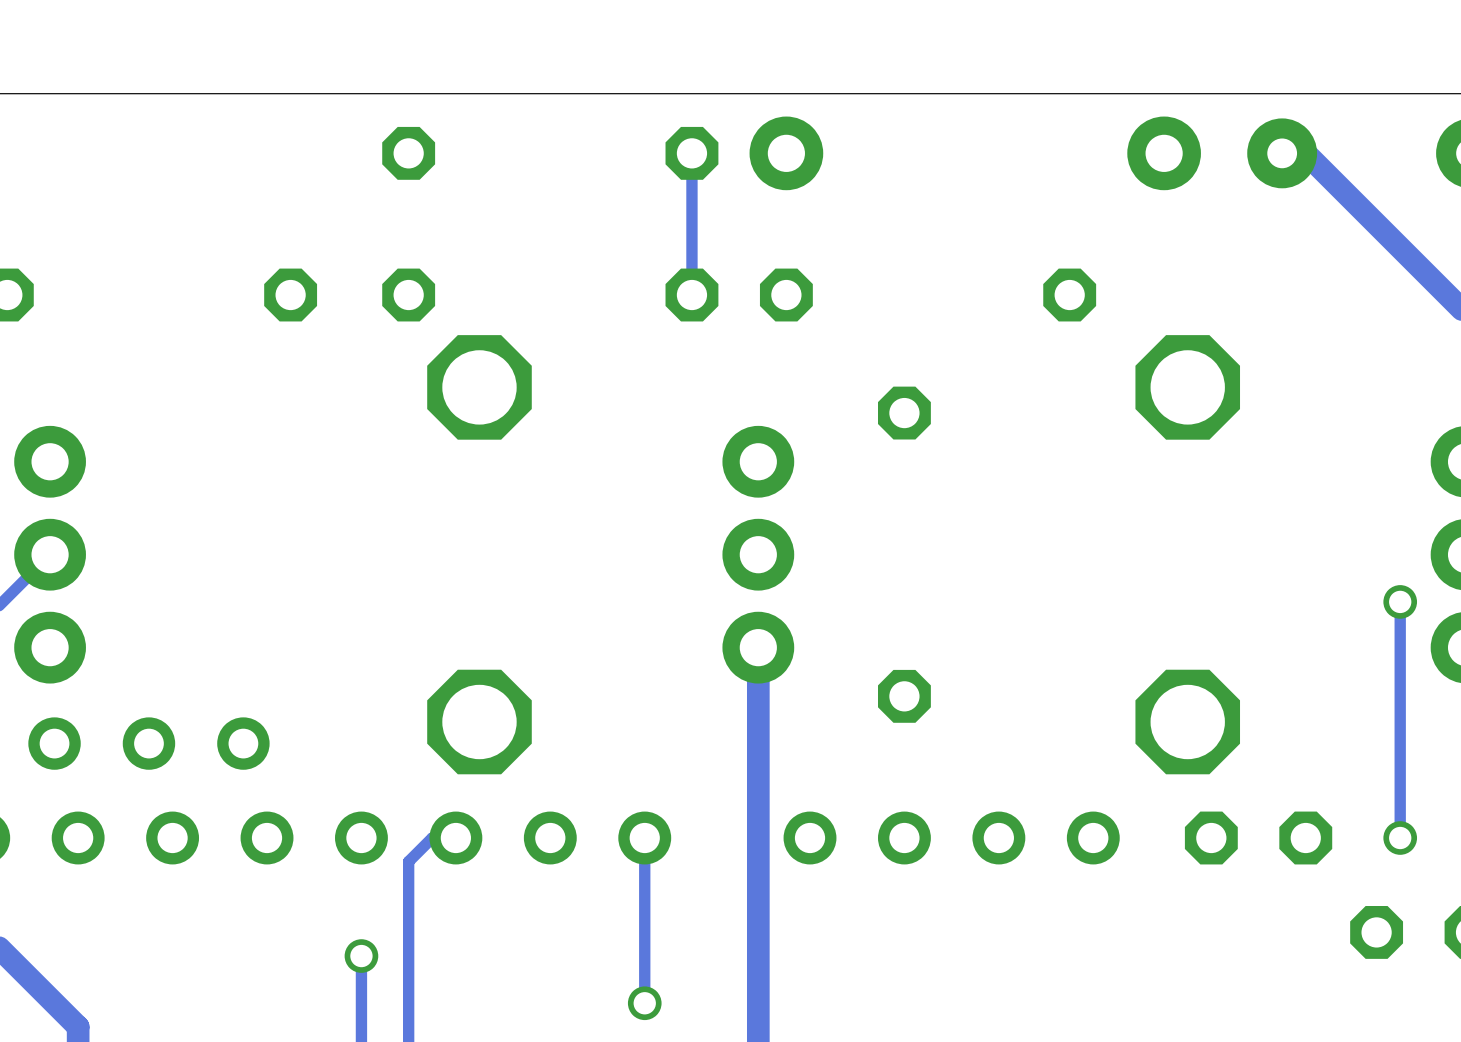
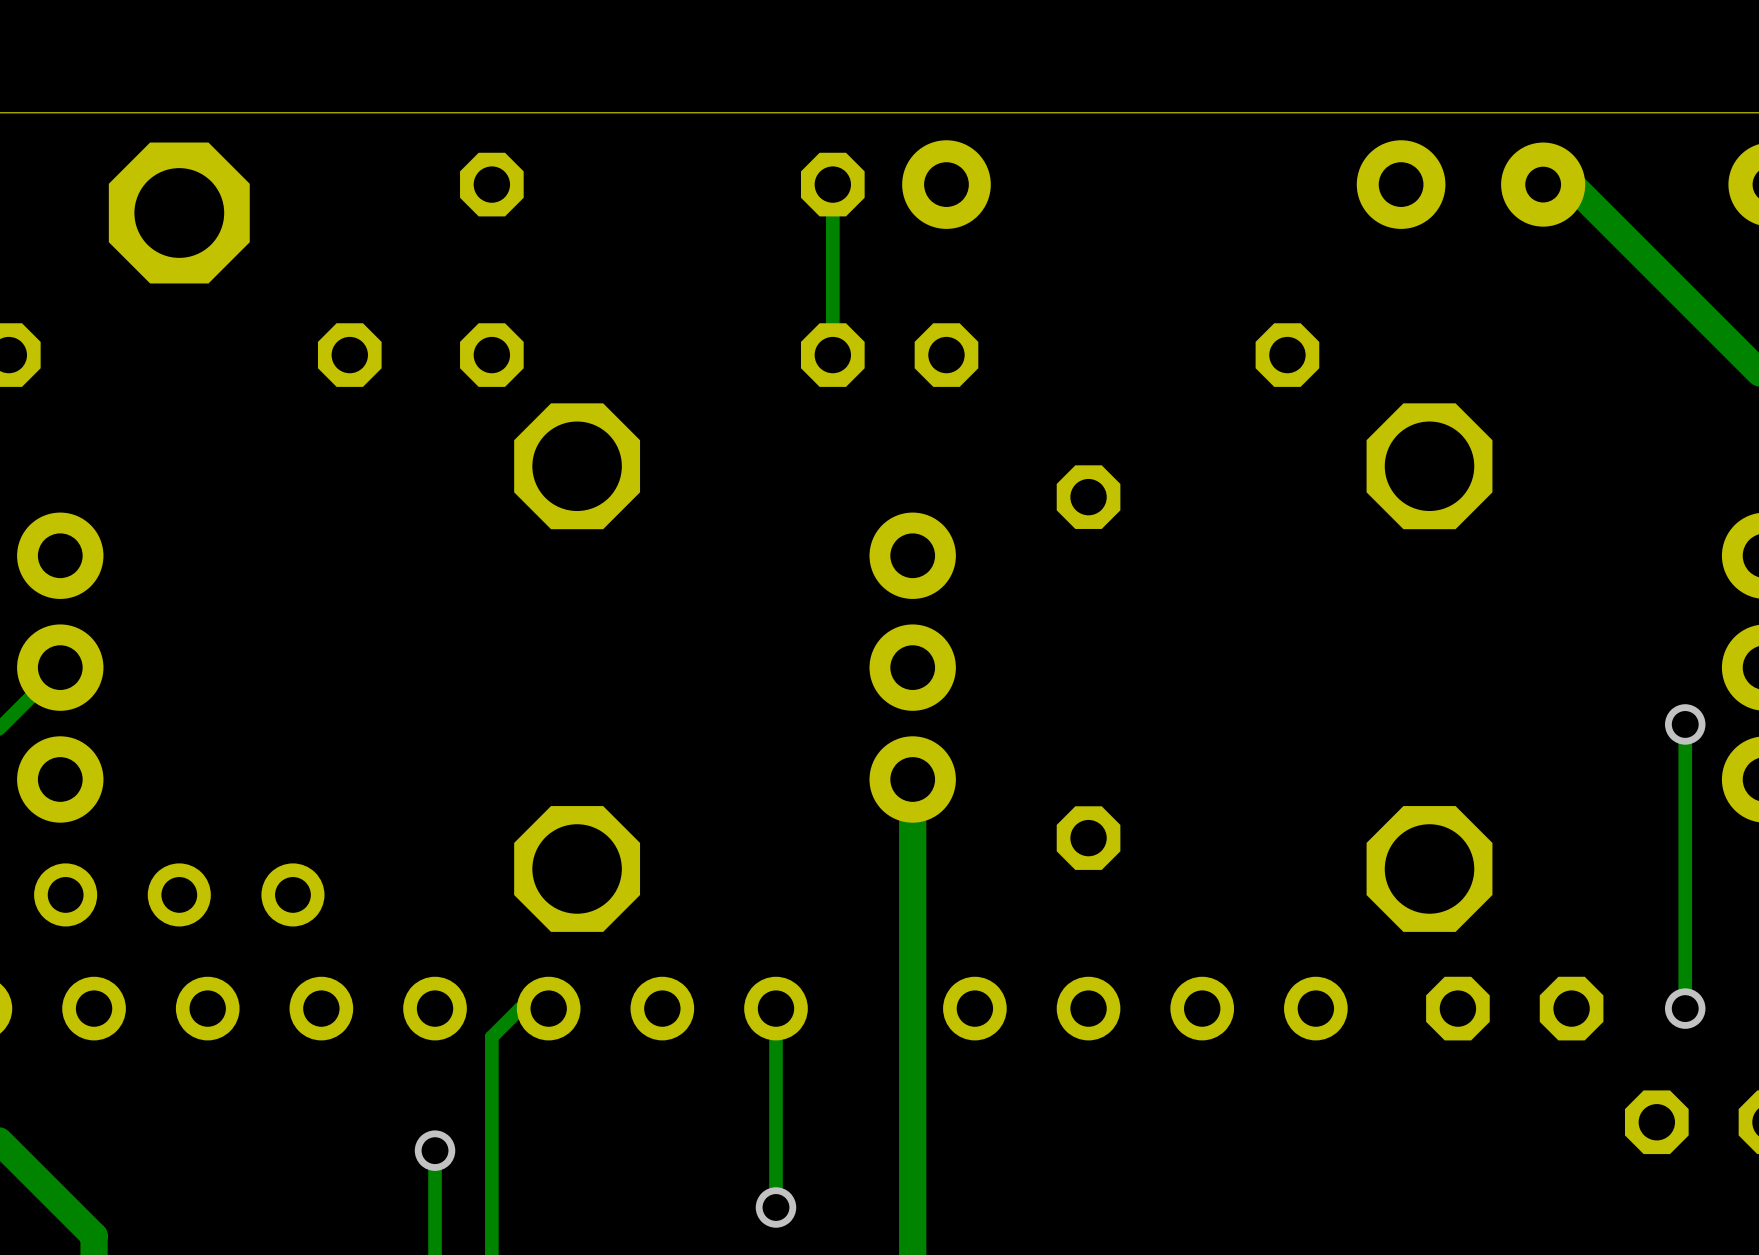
part: none -> (179, 213)

